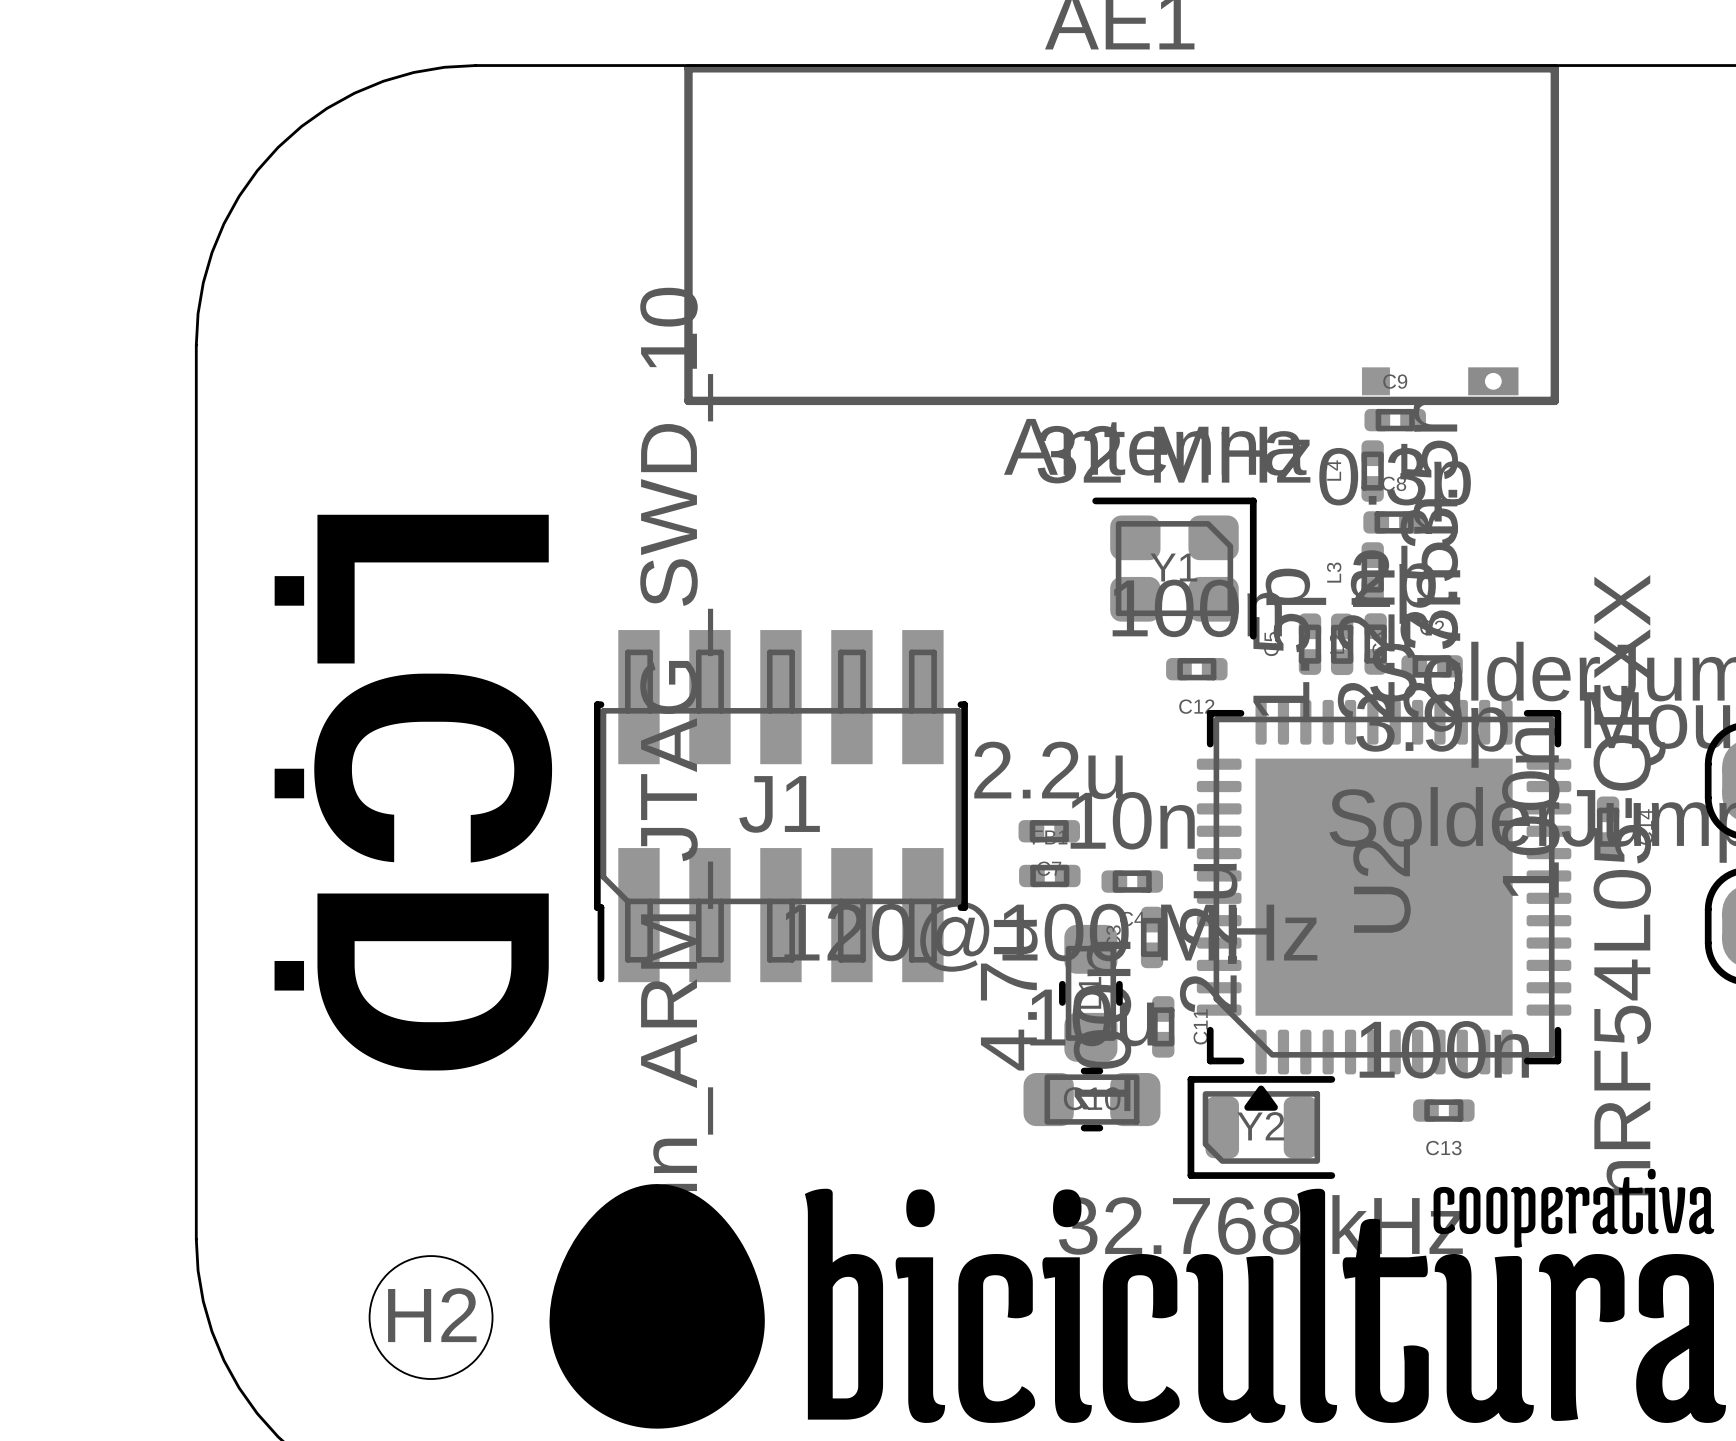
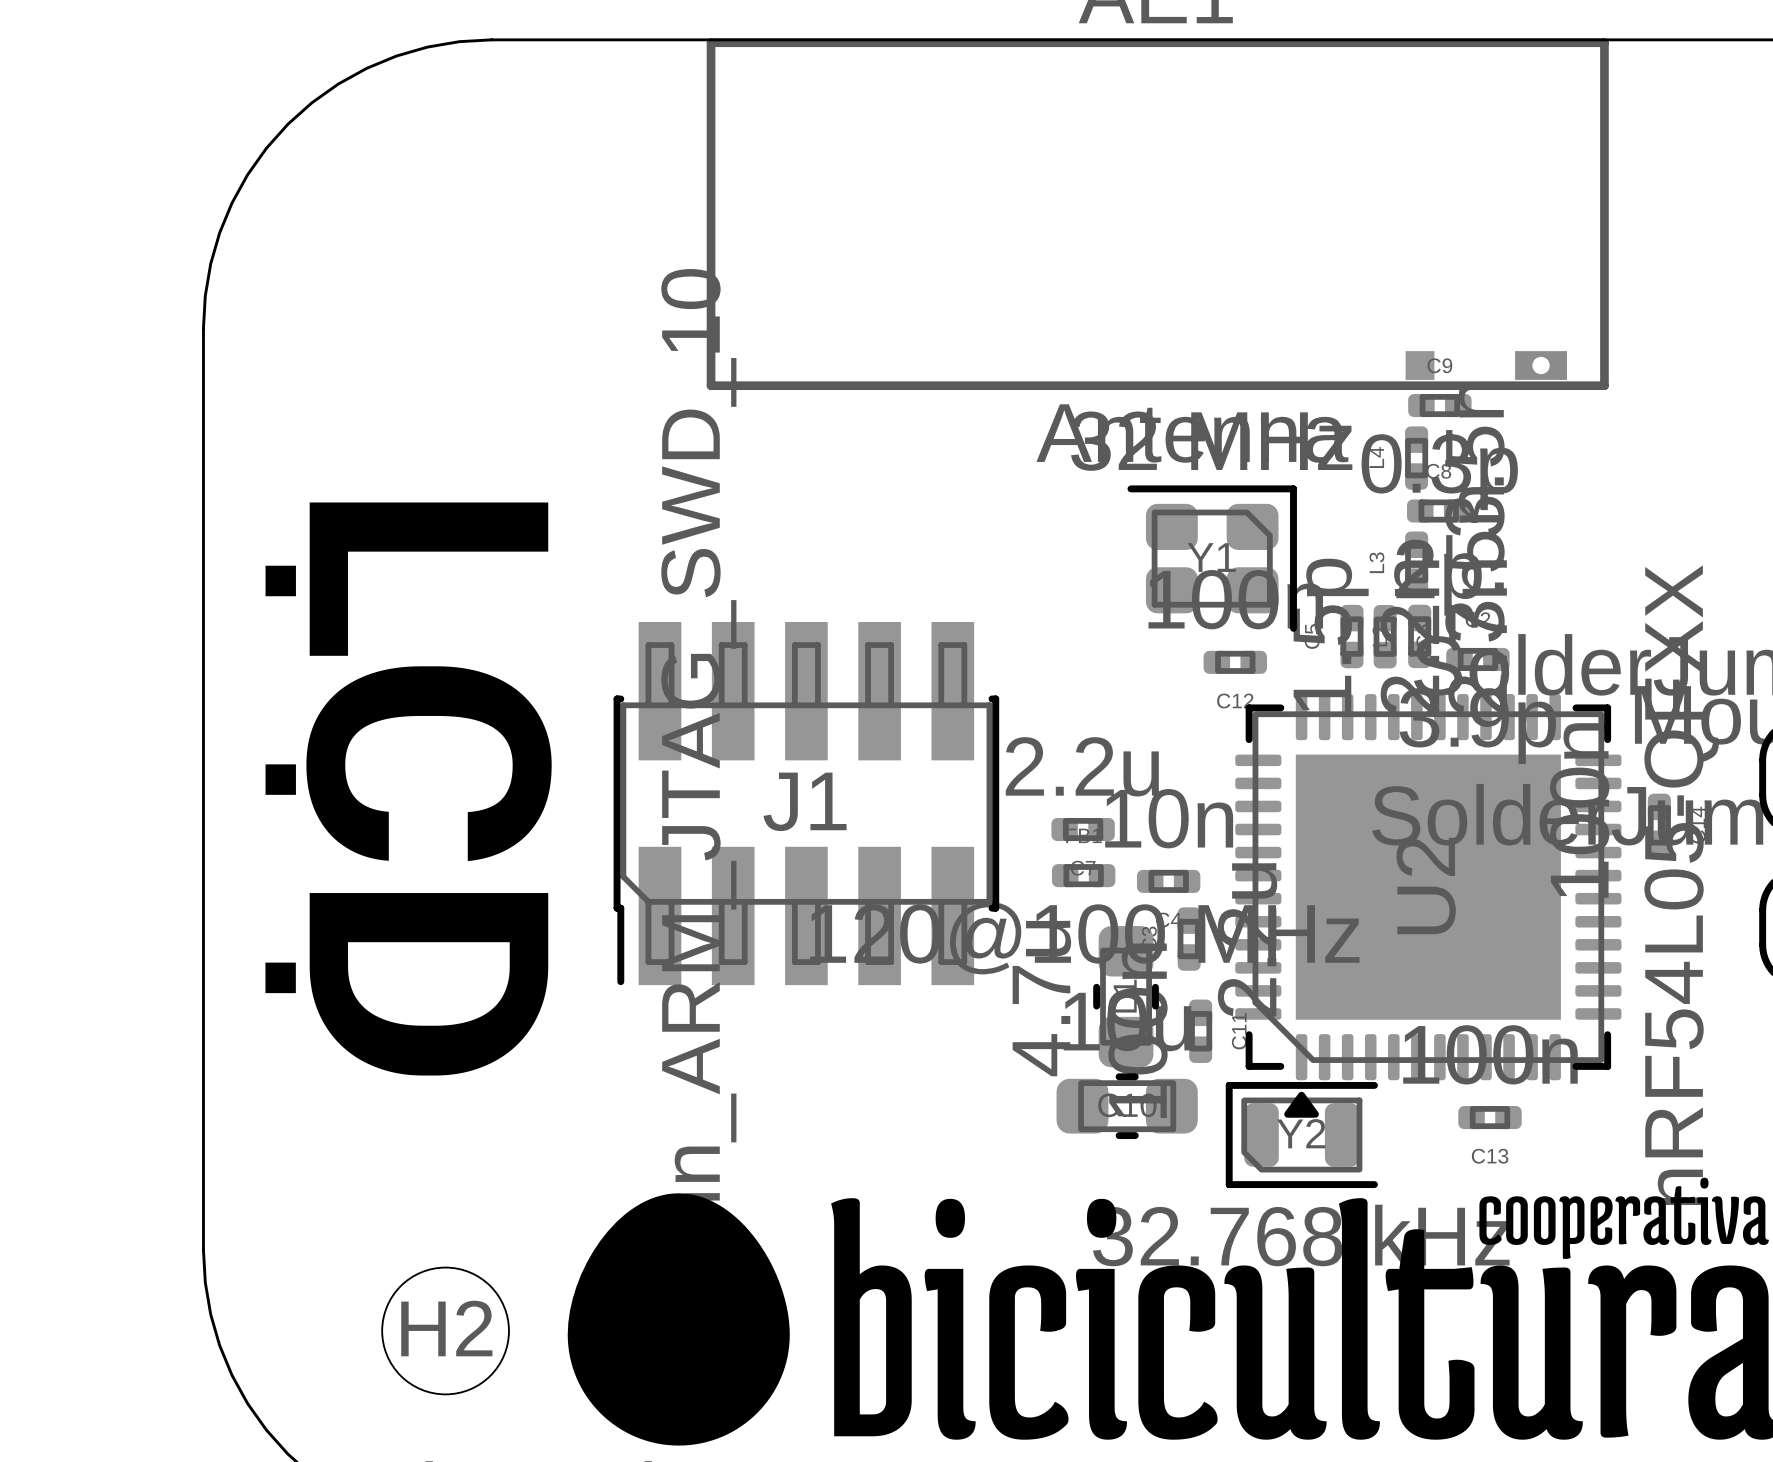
drawing position: (433, 589) -> (428, 579)
drawing position: (289, 590) -> (280, 580)
drawing position: (433, 768) -> (429, 763)
drawing position: (289, 783) -> (280, 779)
drawing position: (289, 975) -> (280, 977)
drawing position: (433, 981) -> (428, 984)

